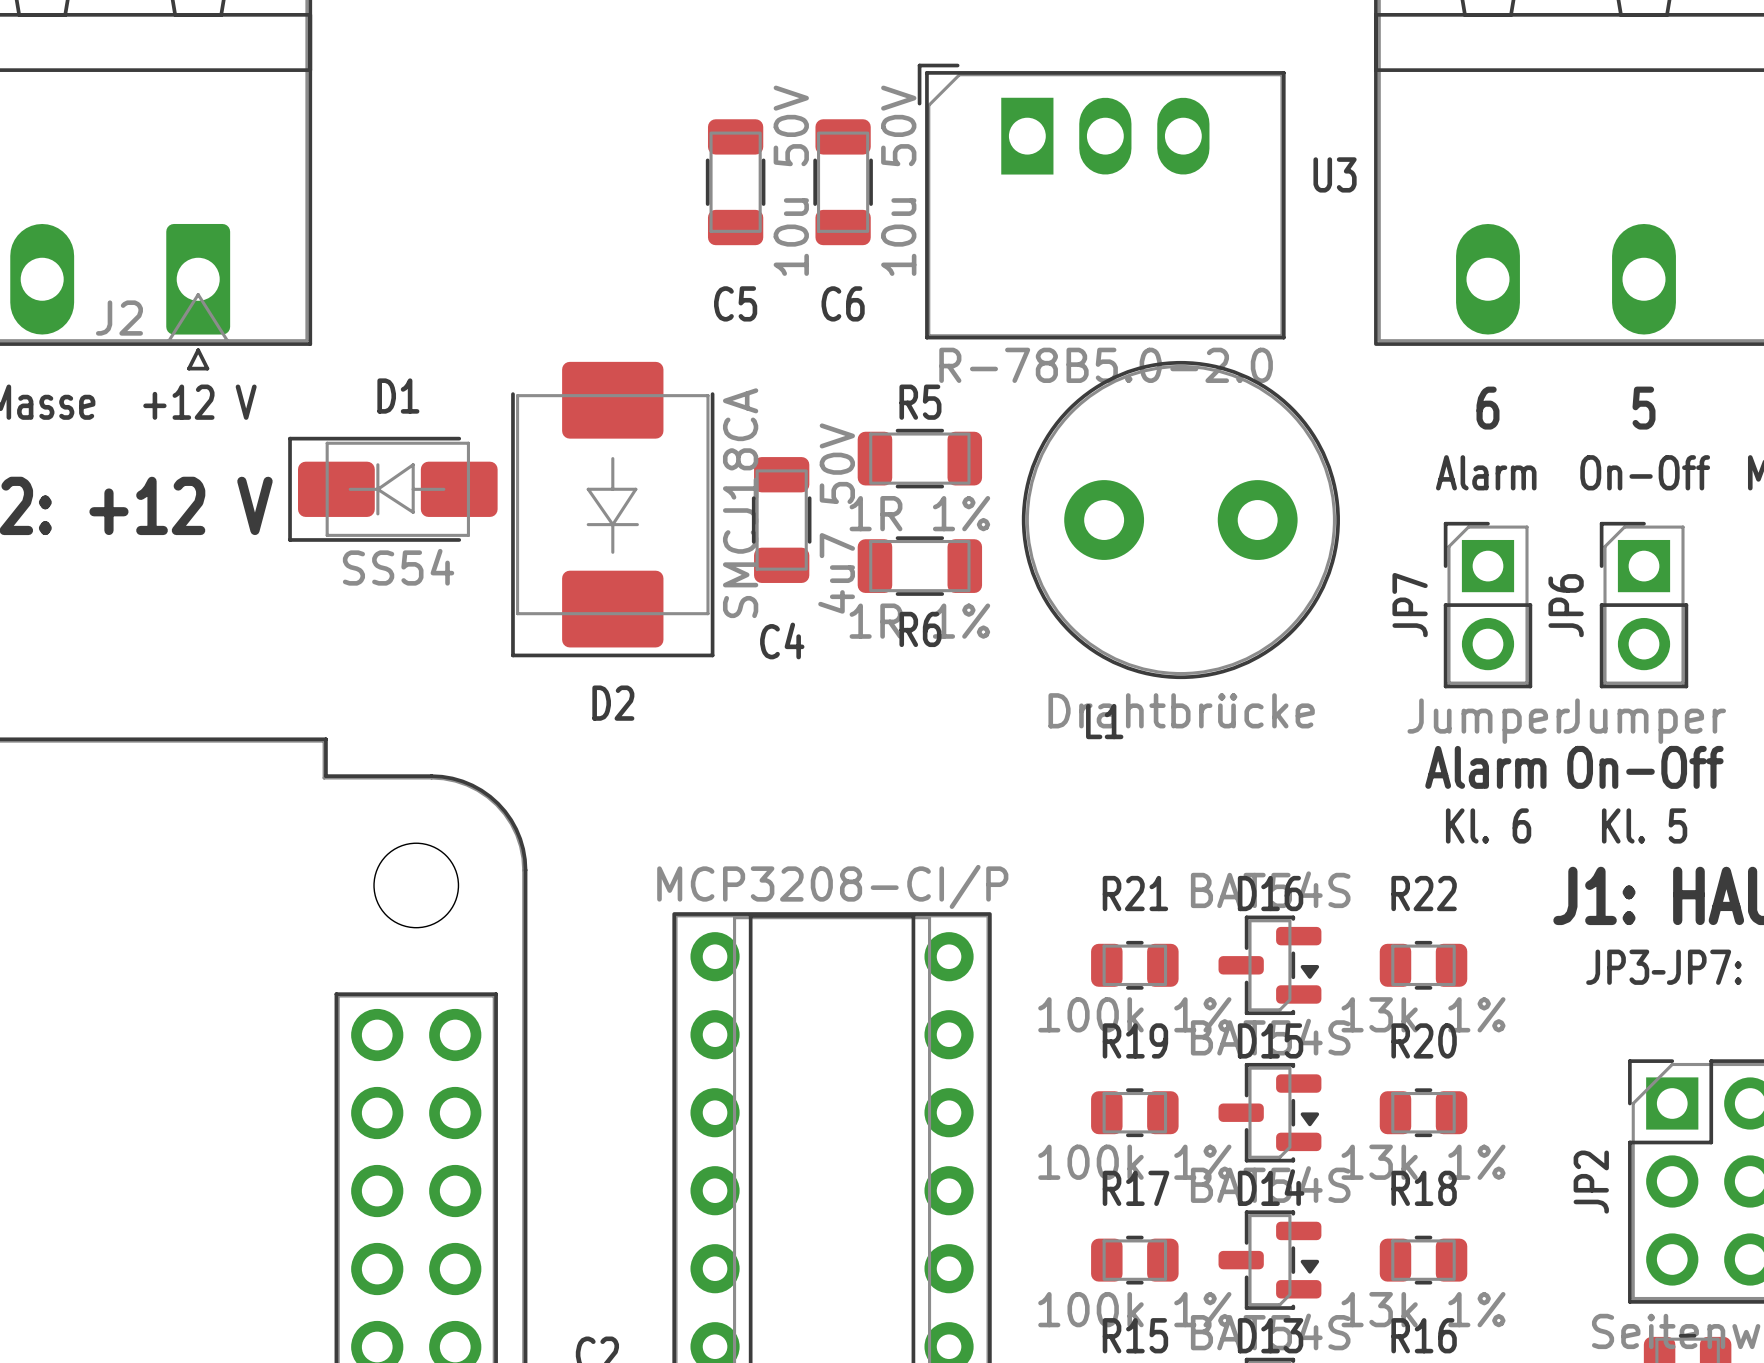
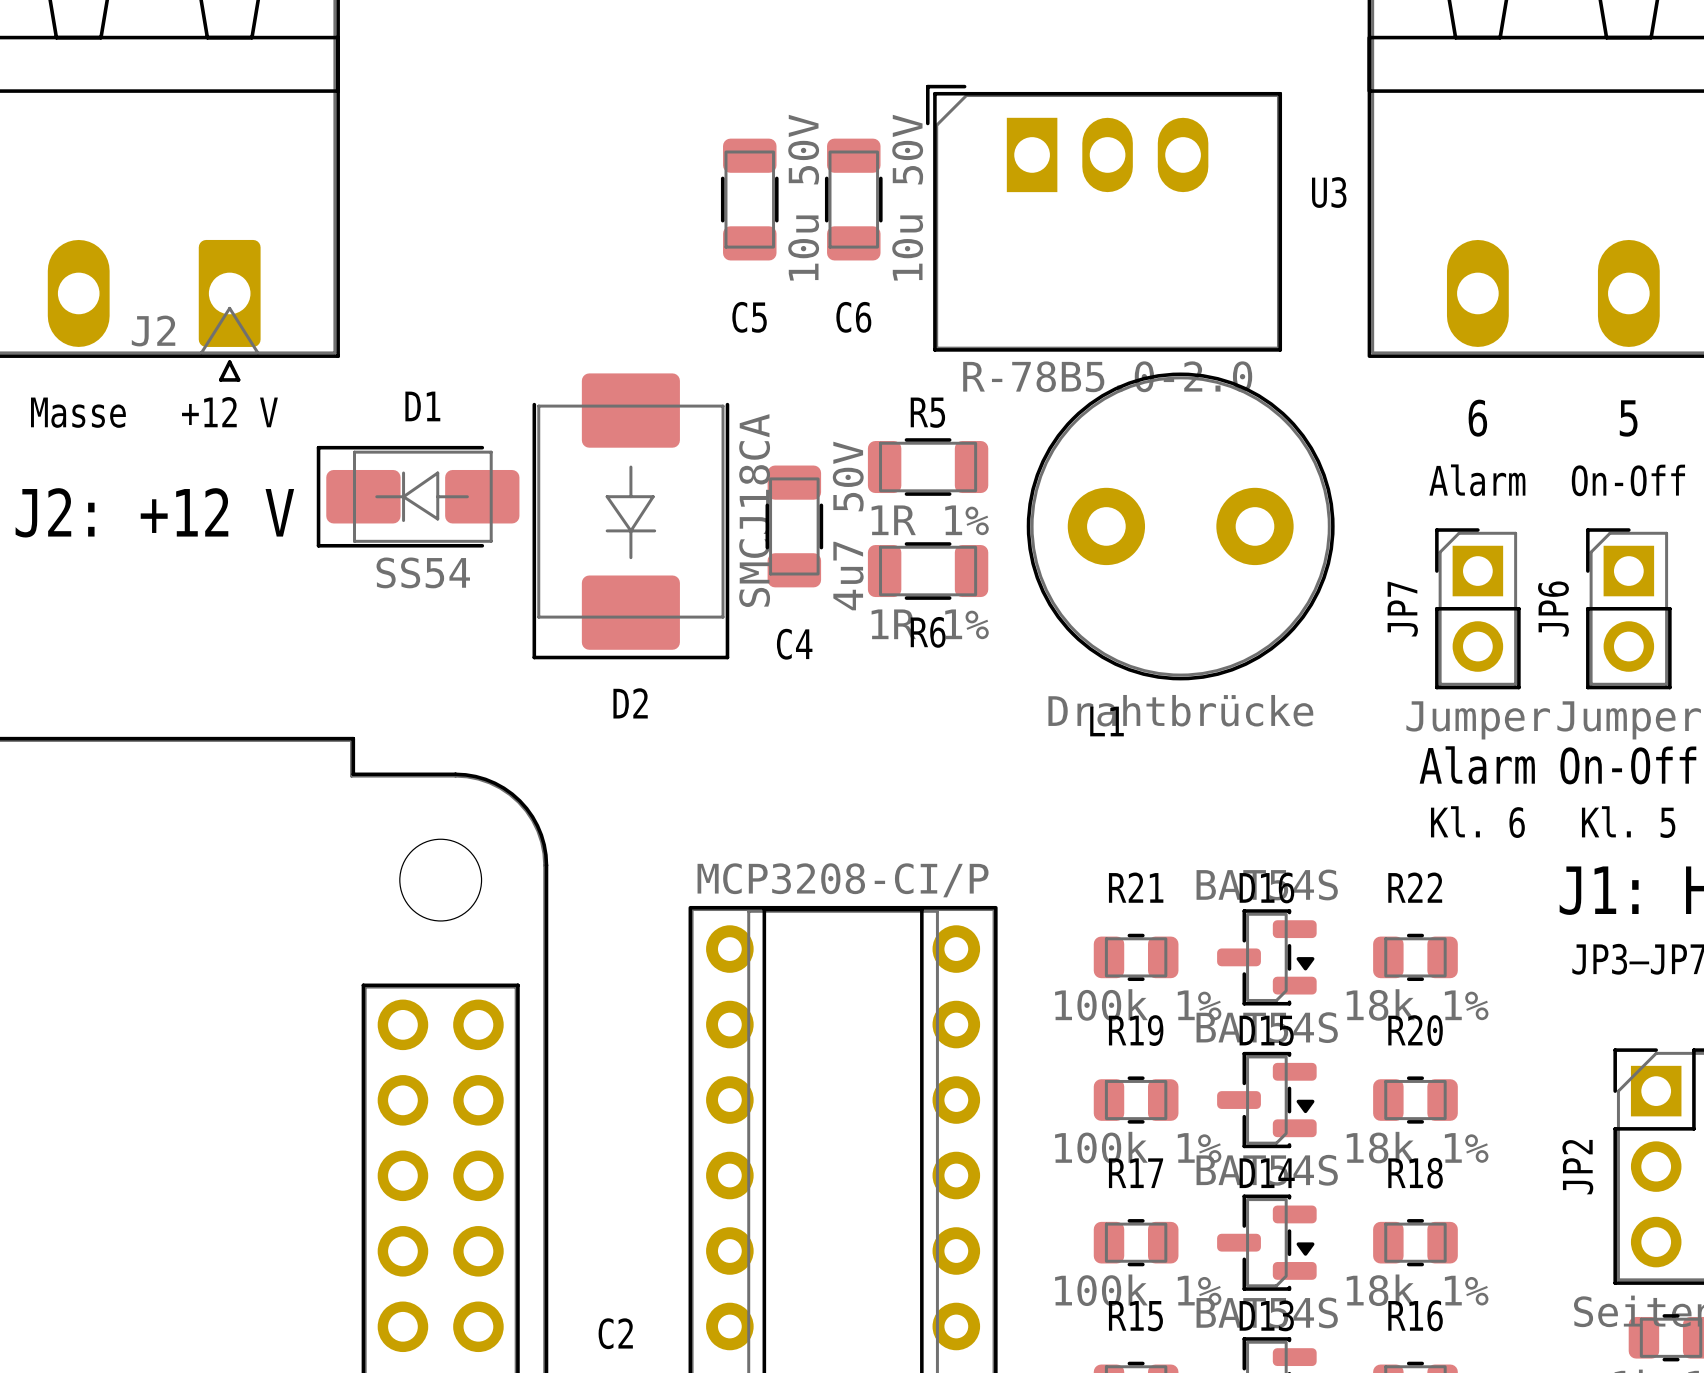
R22 value: 13k 1% (1423, 1014) -> 18k 1% (1417, 1004)
R20 value: 13k 1% (1423, 1162) -> 18k 1% (1417, 1147)
R18 value: 13k 1% (1423, 1309) -> 18k 1% (1417, 1290)

